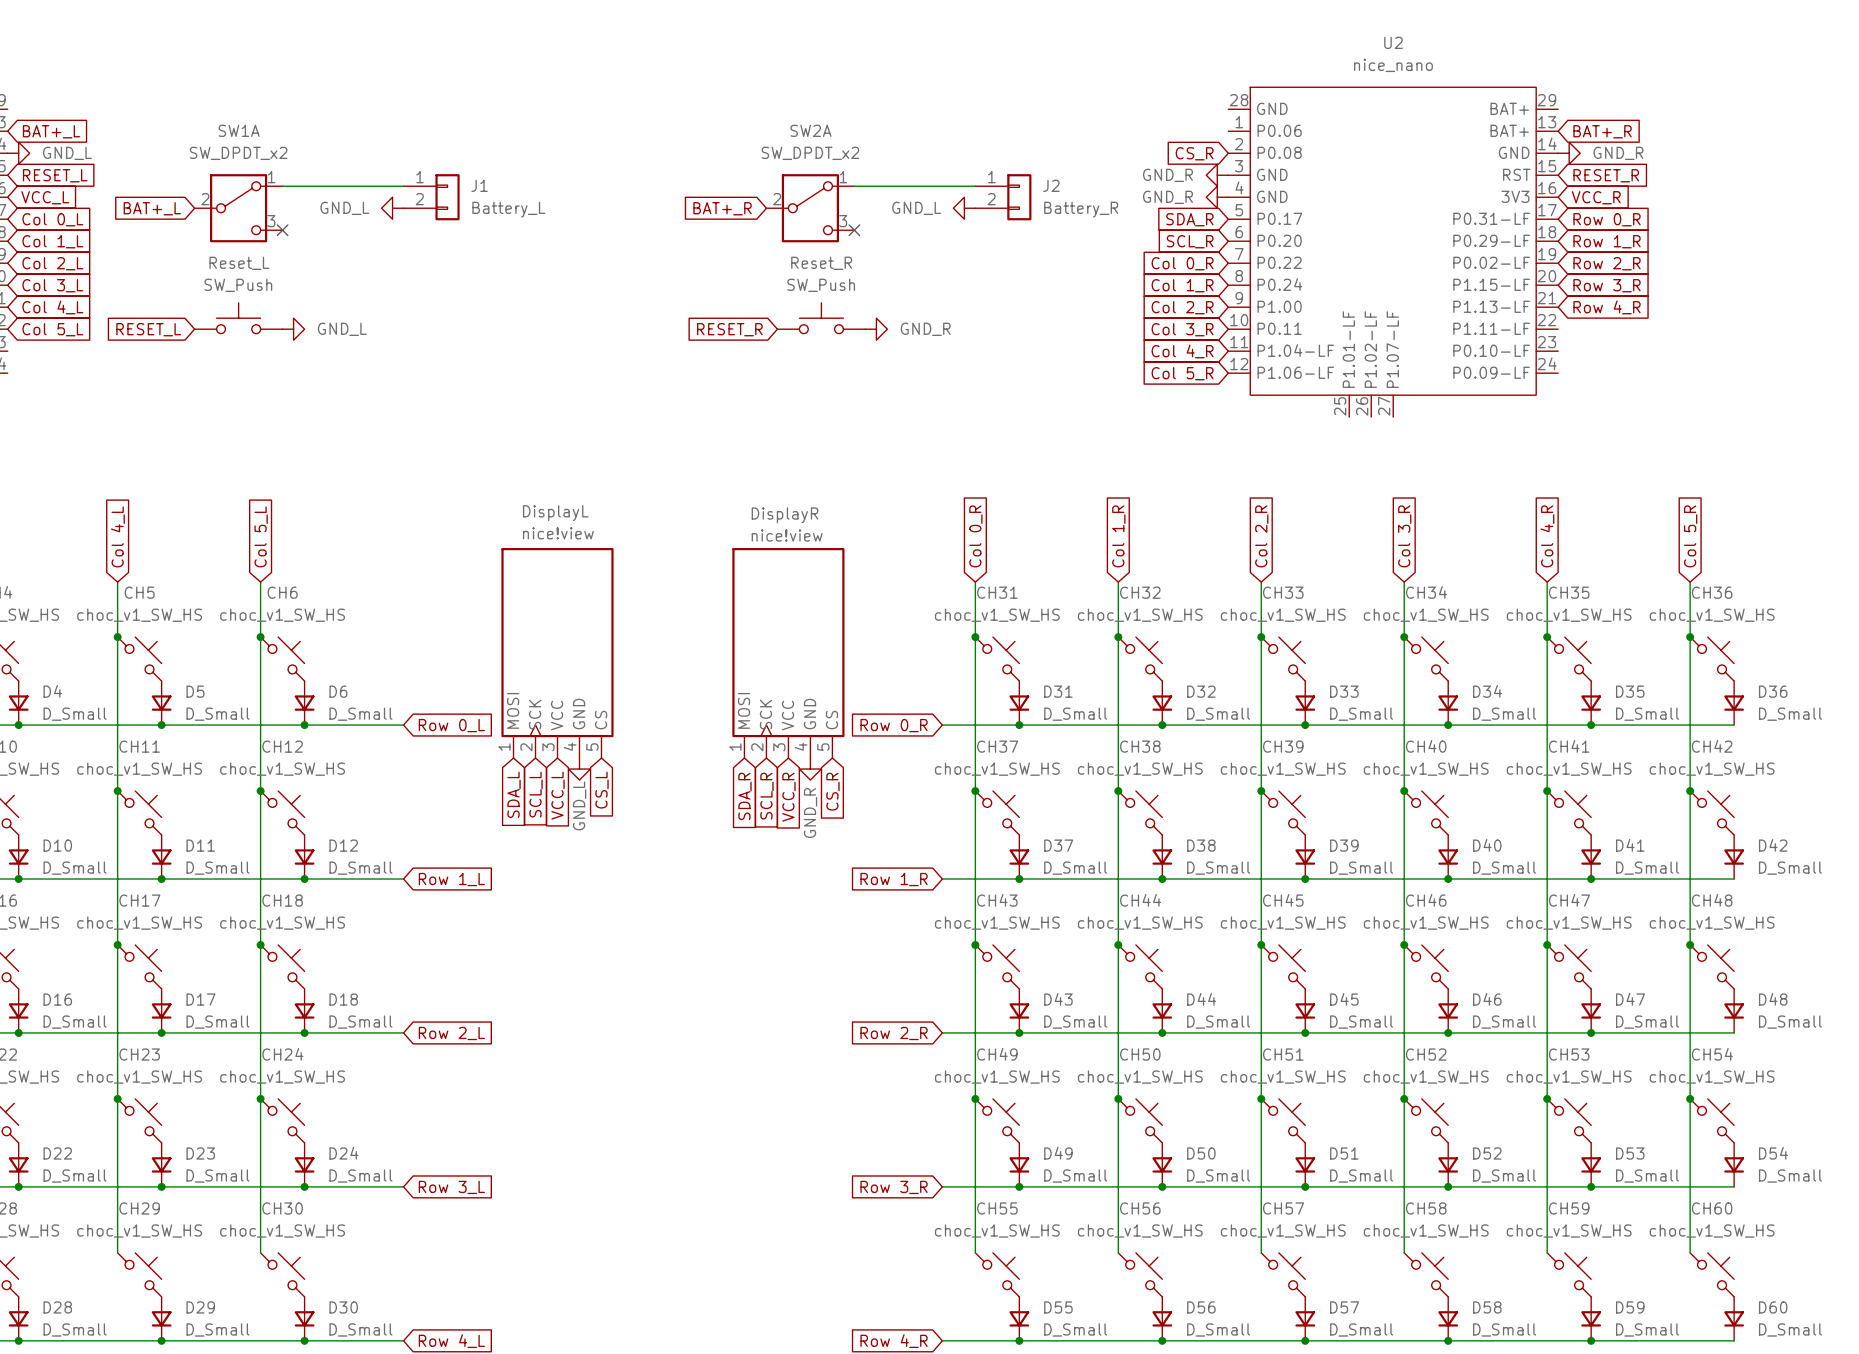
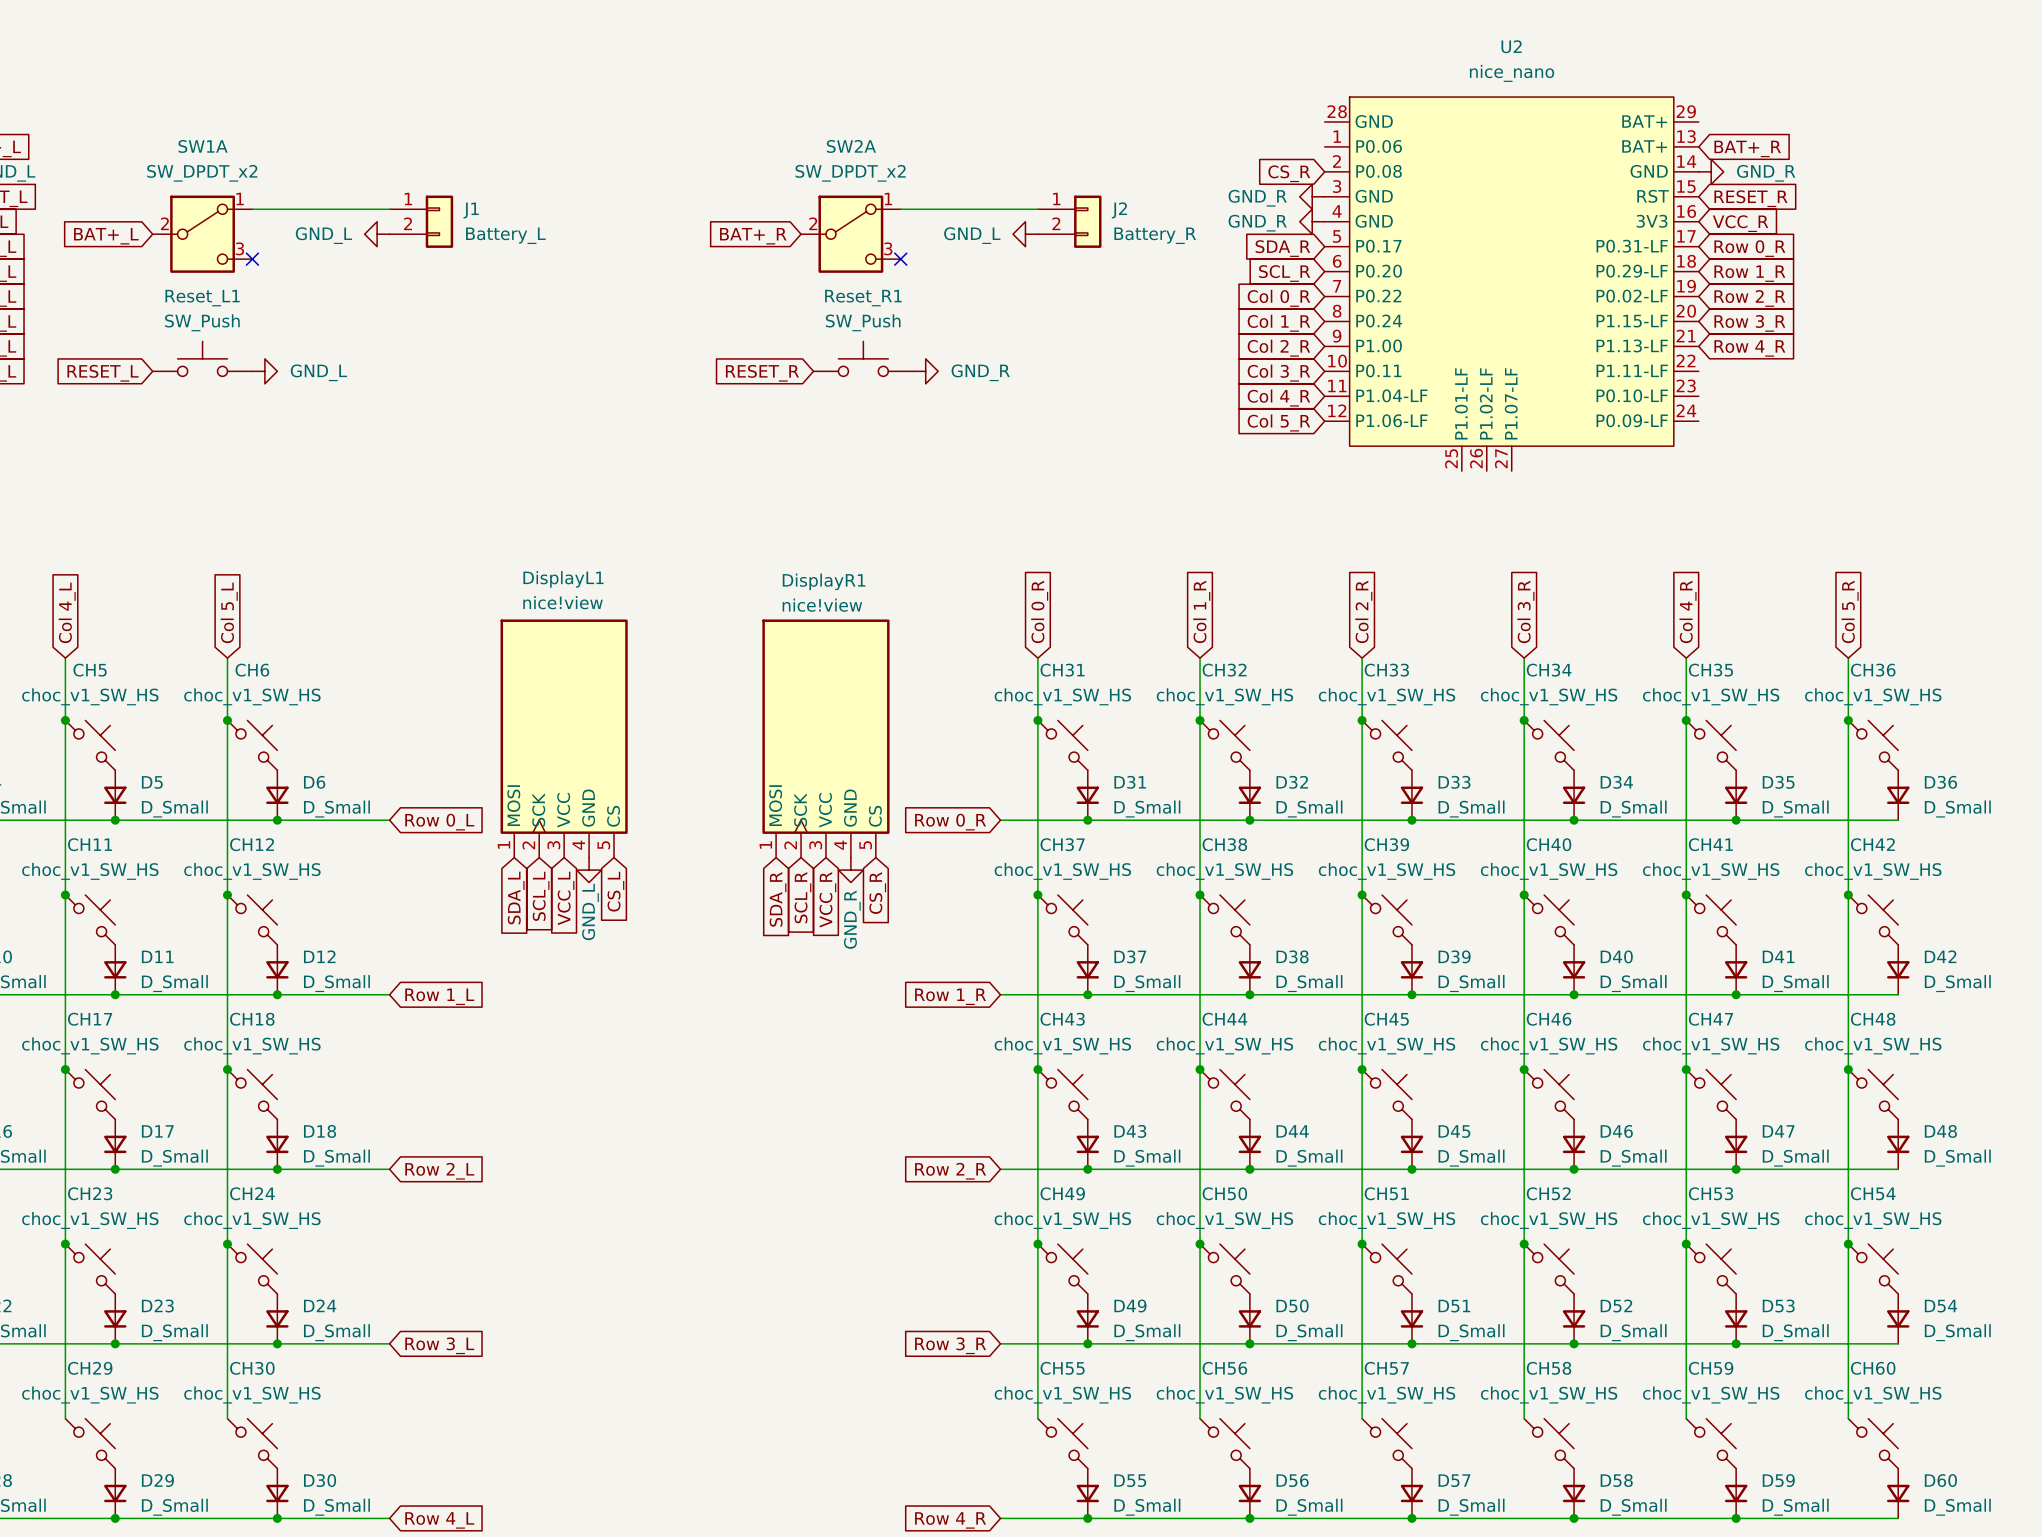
Reset_L name: Reset_L (239, 263) -> Reset_L1 (202, 298)
Reset_R name: Reset_R (821, 263) -> Reset_R1 (863, 298)
DisplayL name: DisplayL (555, 513) -> DisplayL1 (563, 579)
DisplayR name: DisplayR (785, 515) -> DisplayR1 (824, 581)

